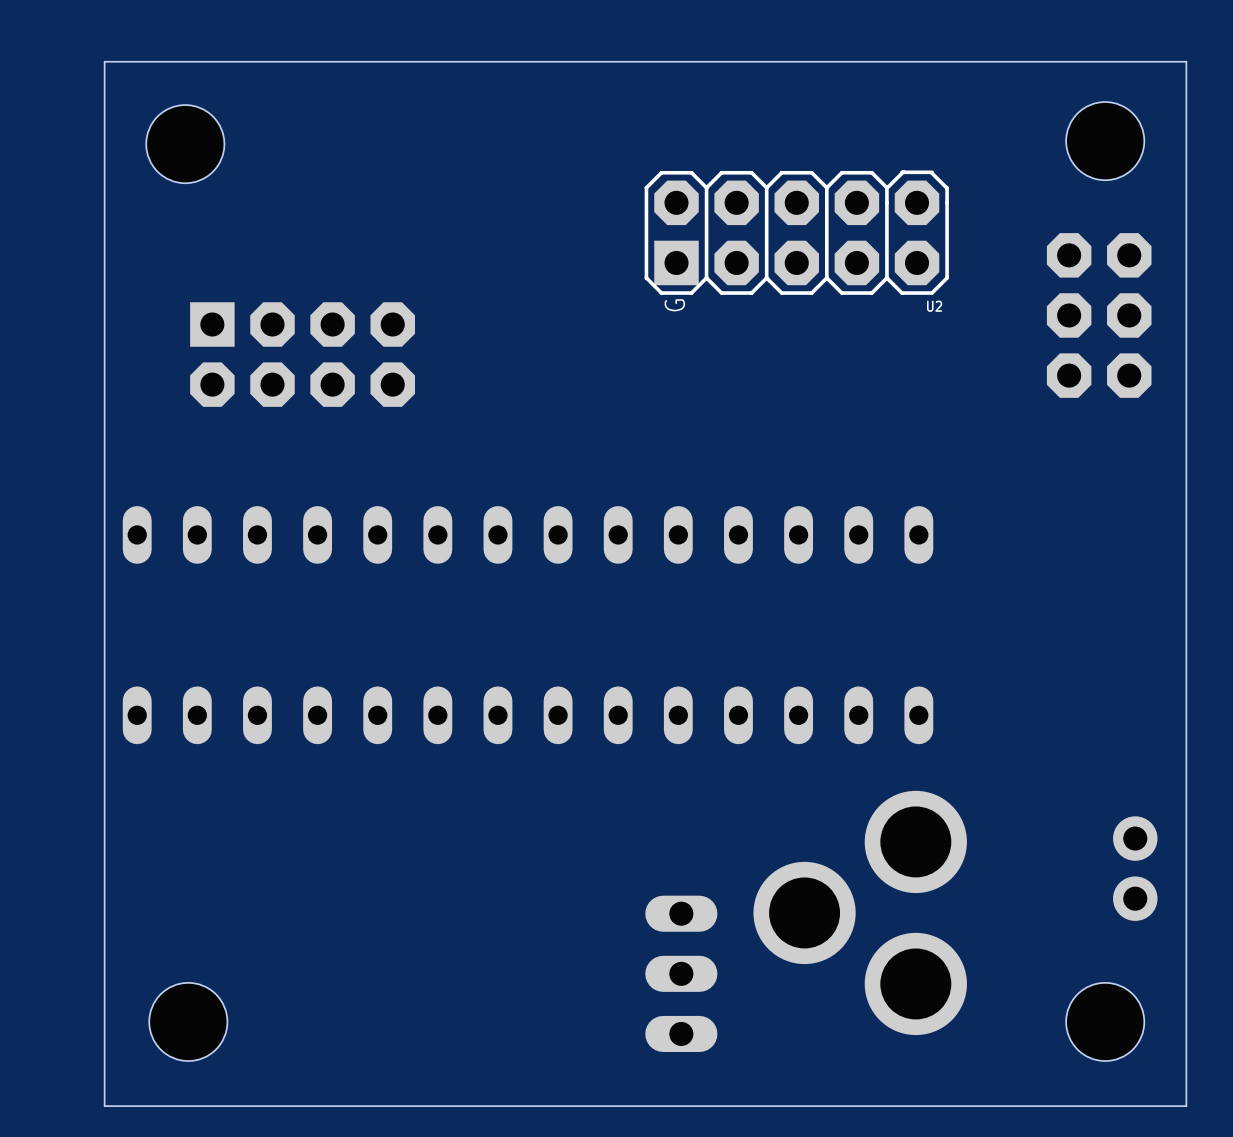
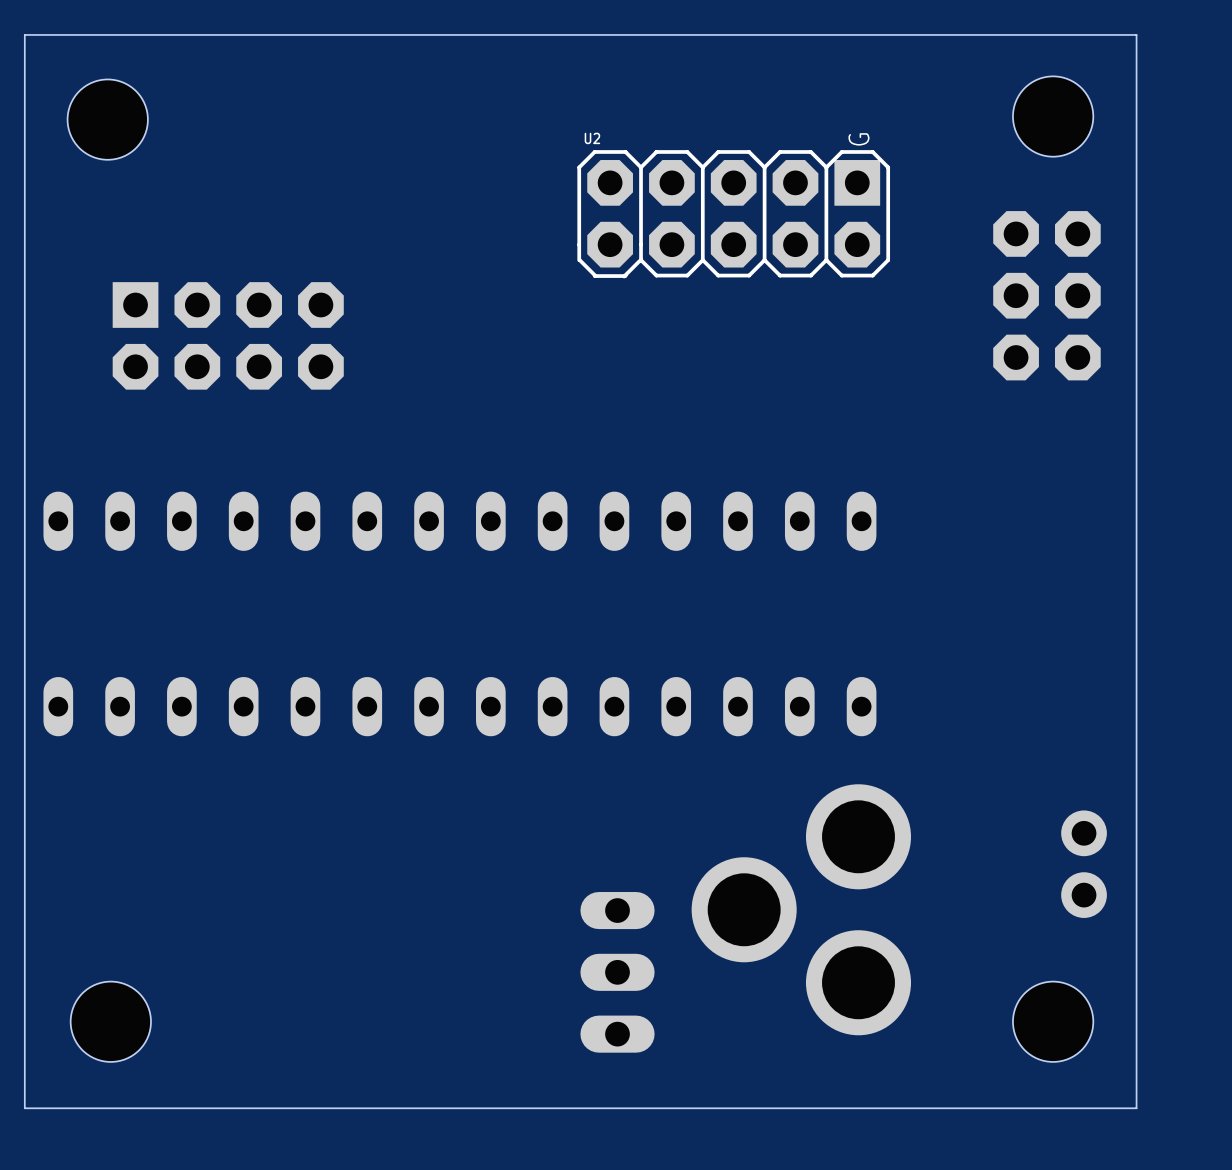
U2 footprint: [644, 170, 949, 295] -> [577, 150, 891, 279]
U2 name position: U2 (934, 306) -> U2 (592, 138)

